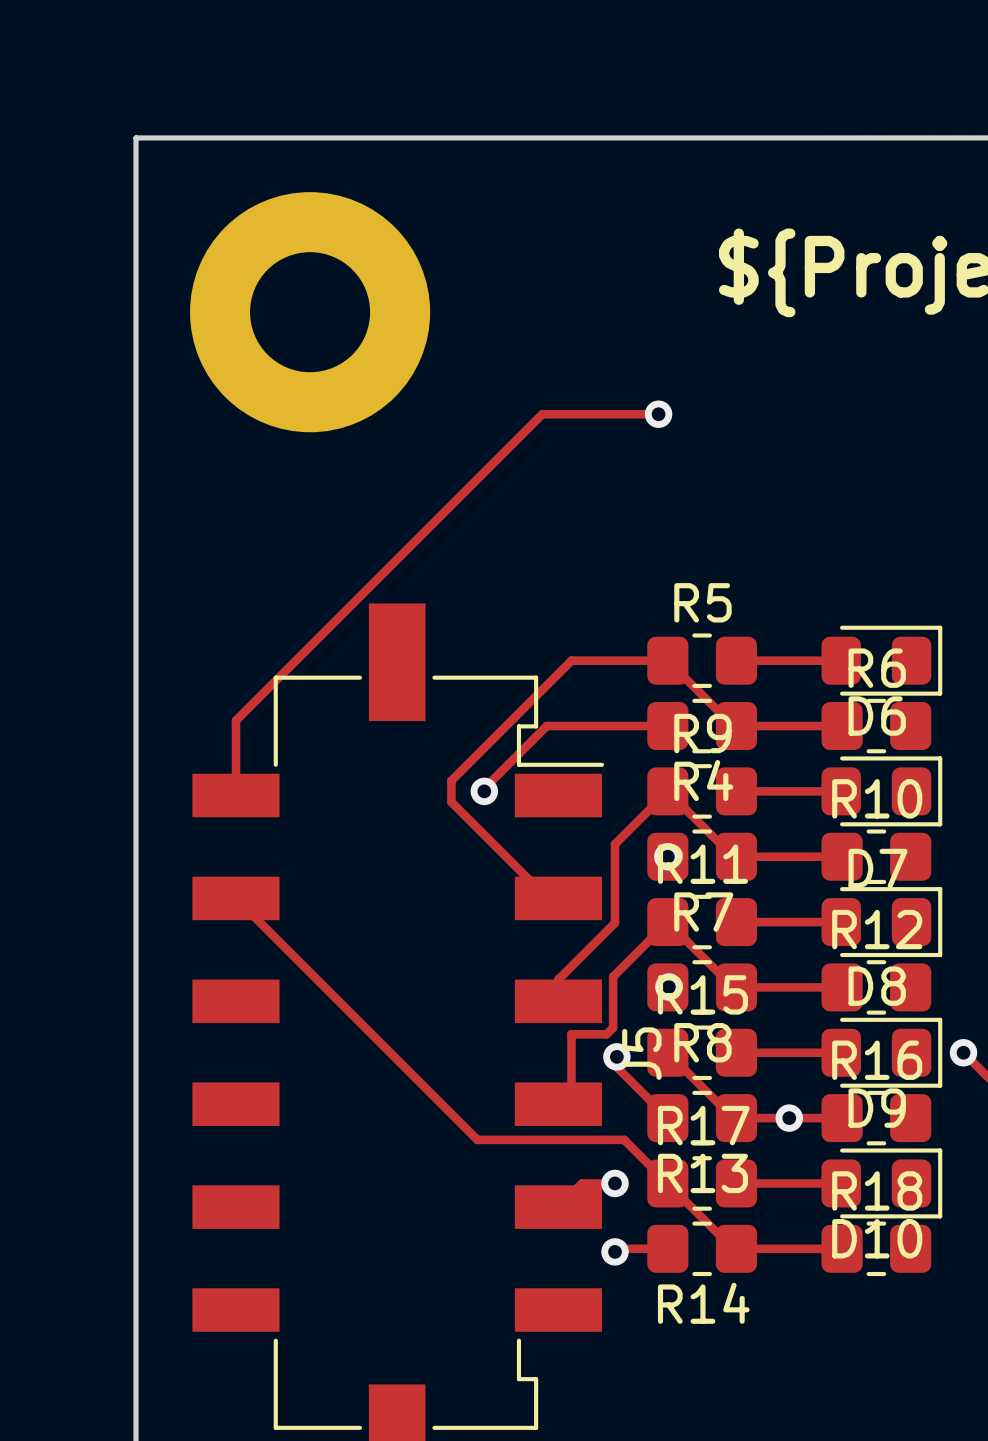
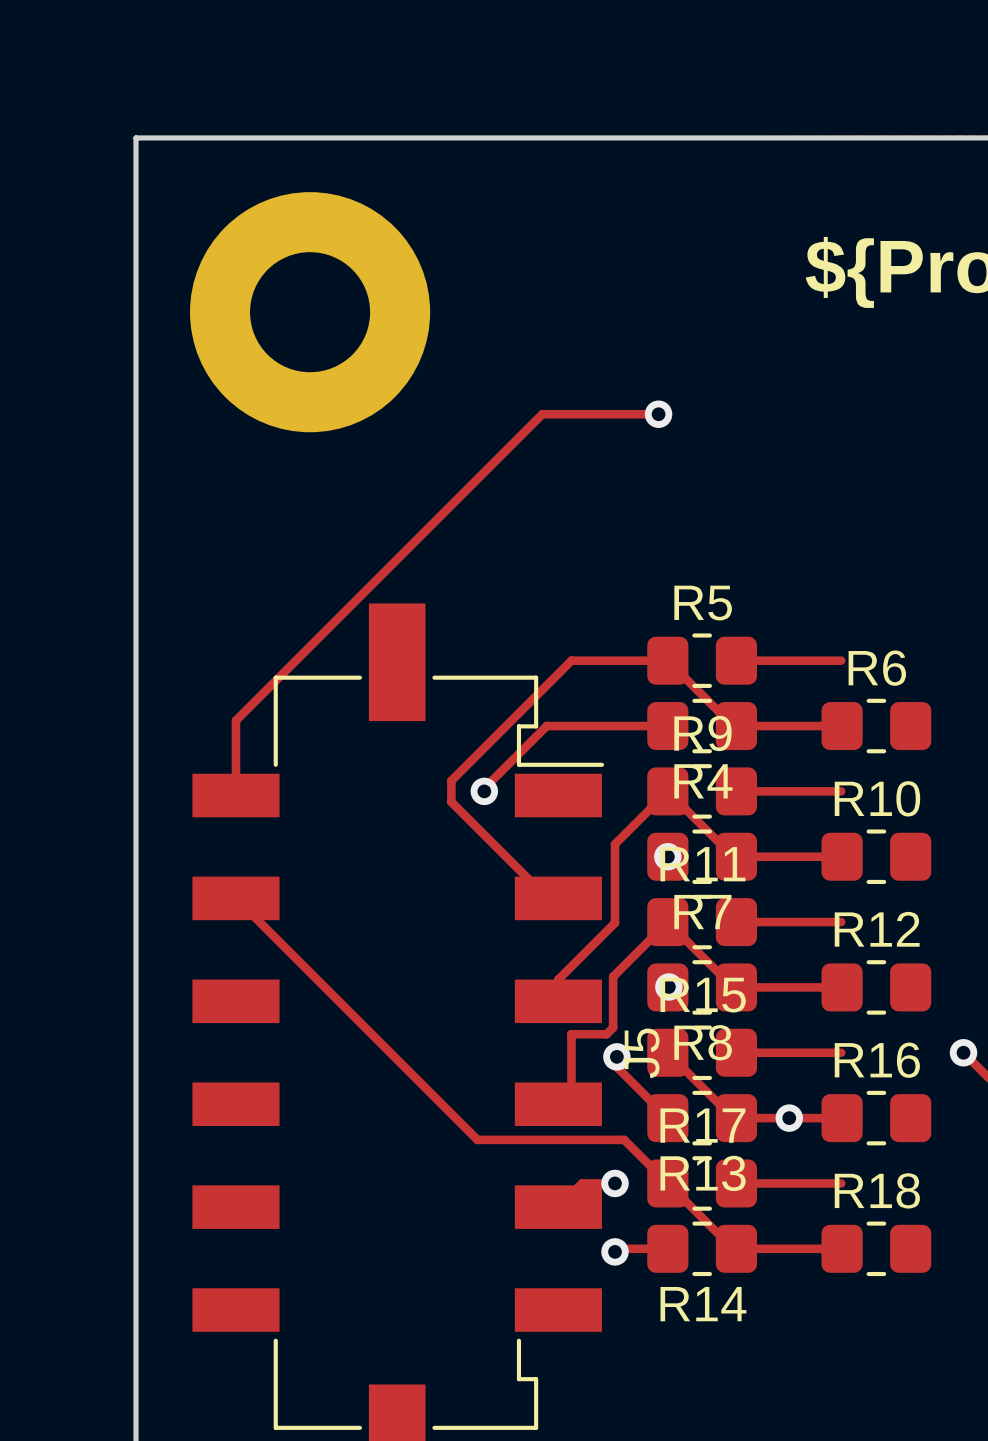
D6: (881, 660) -> none
D7: (881, 791) -> none
D8: (881, 922) -> none
D9: (881, 1052) -> none
D10: (881, 1183) -> none

